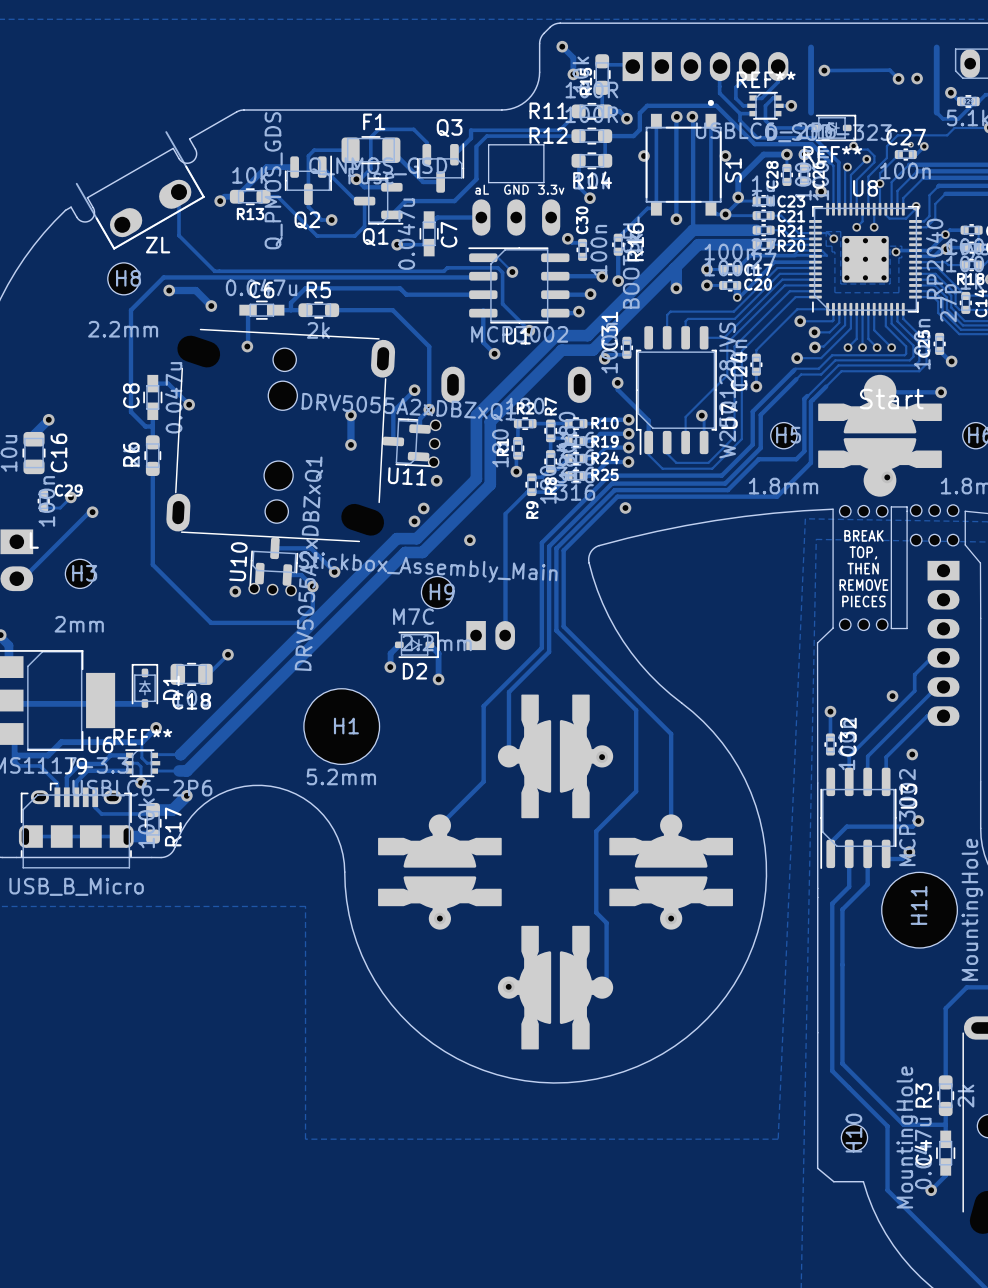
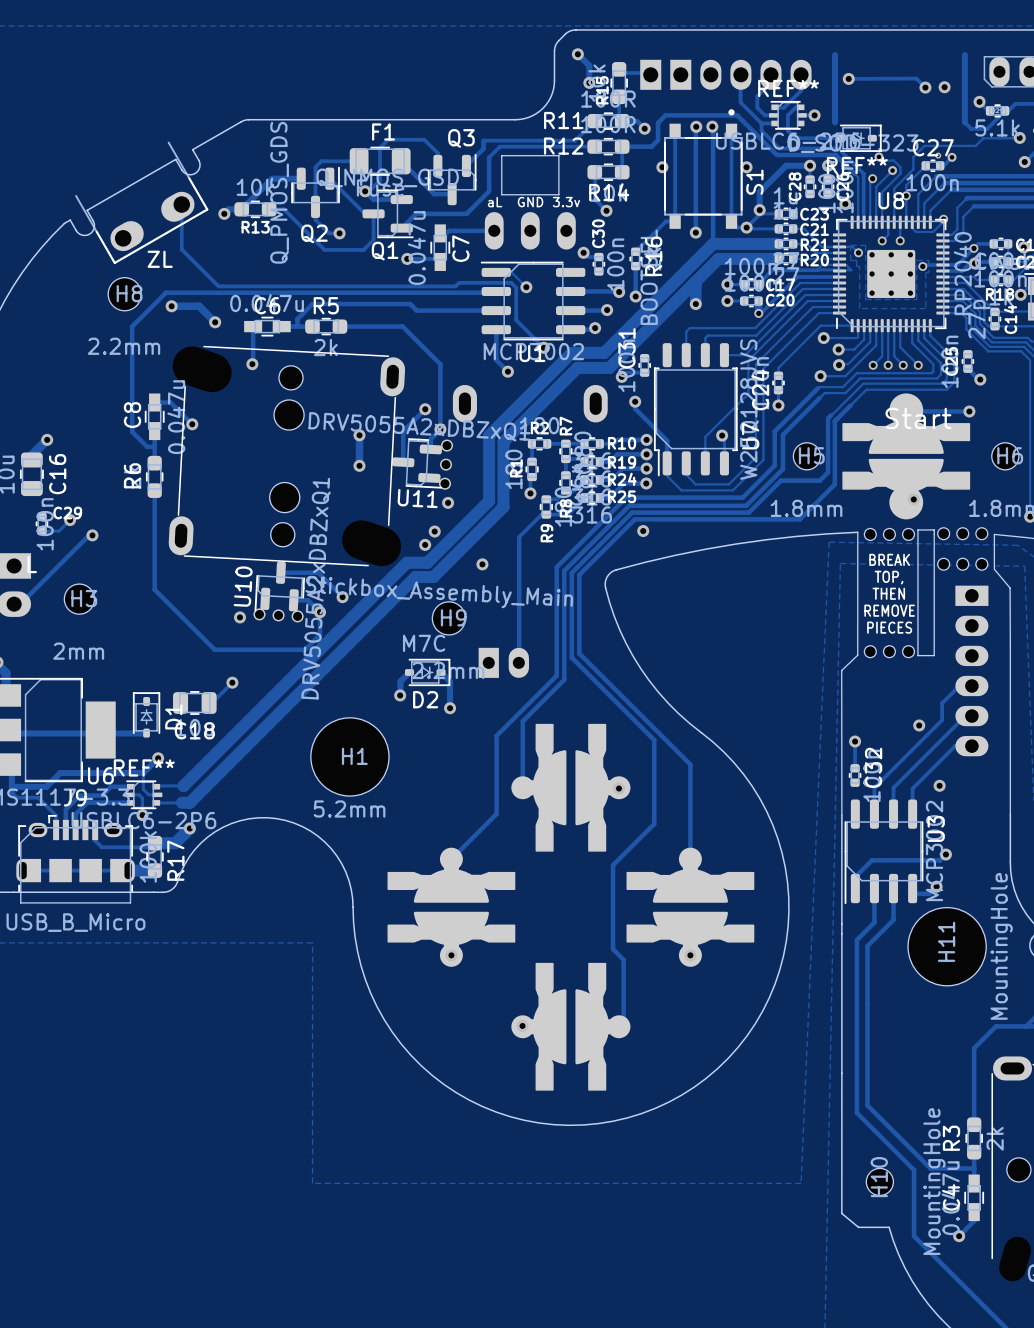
part footprint: [166, 328, 442, 597] -> [168, 345, 454, 623]

